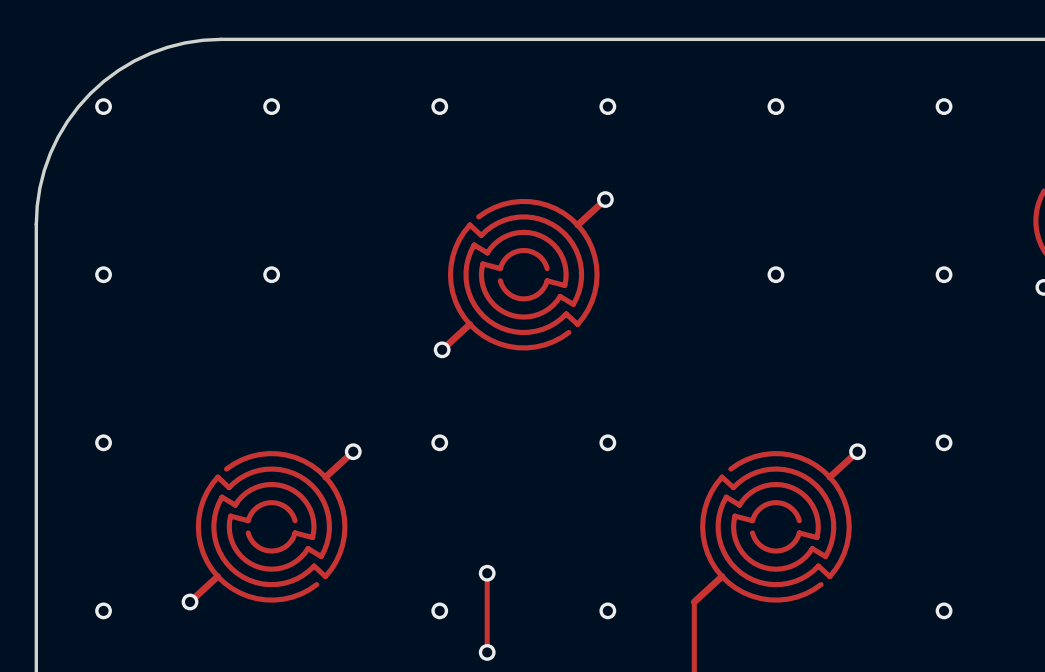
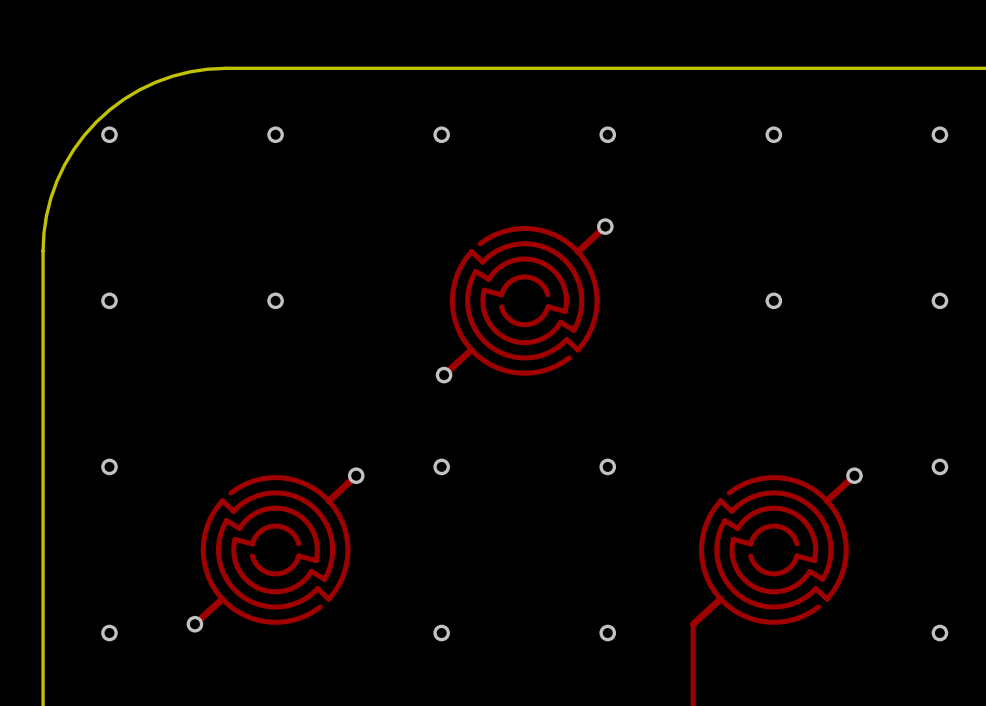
track: (487, 573) (487, 652) -> none
via: (487, 573) -> none
via: (487, 652) -> none

